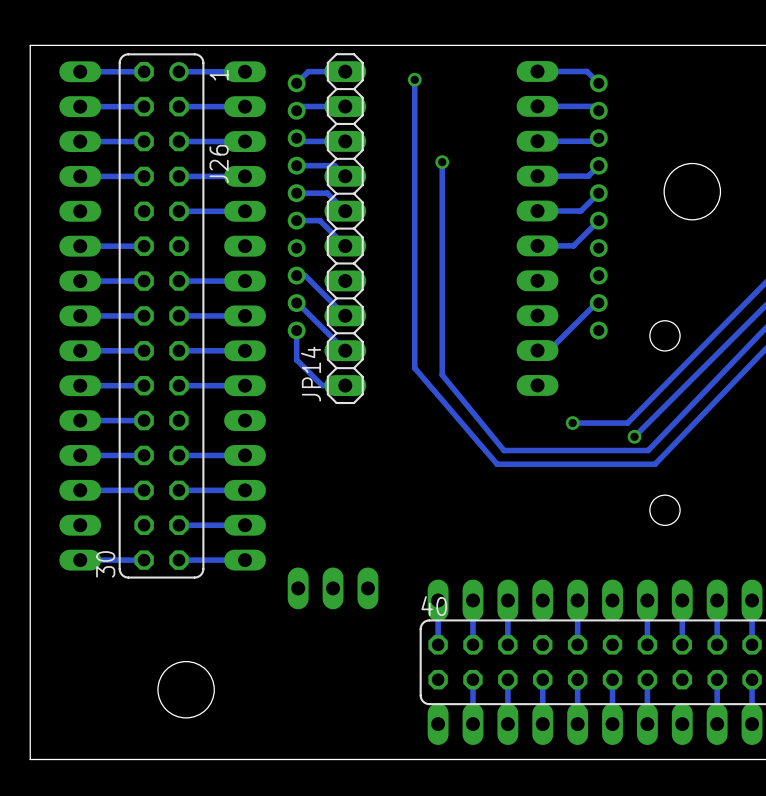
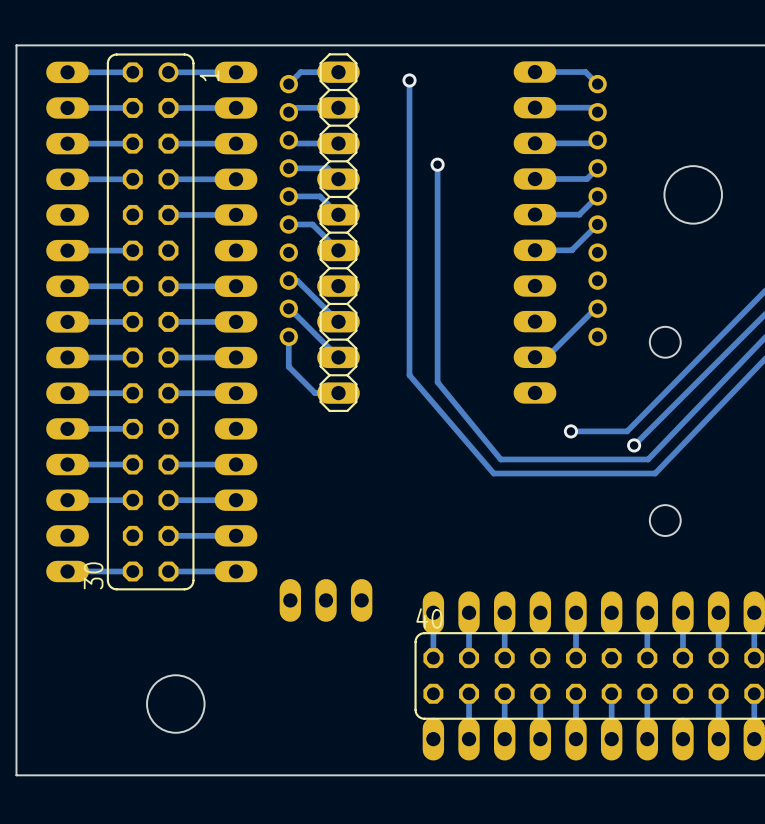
J26 name: J26 (219, 163) -> none
JP14 name: JP14 (311, 374) -> none

